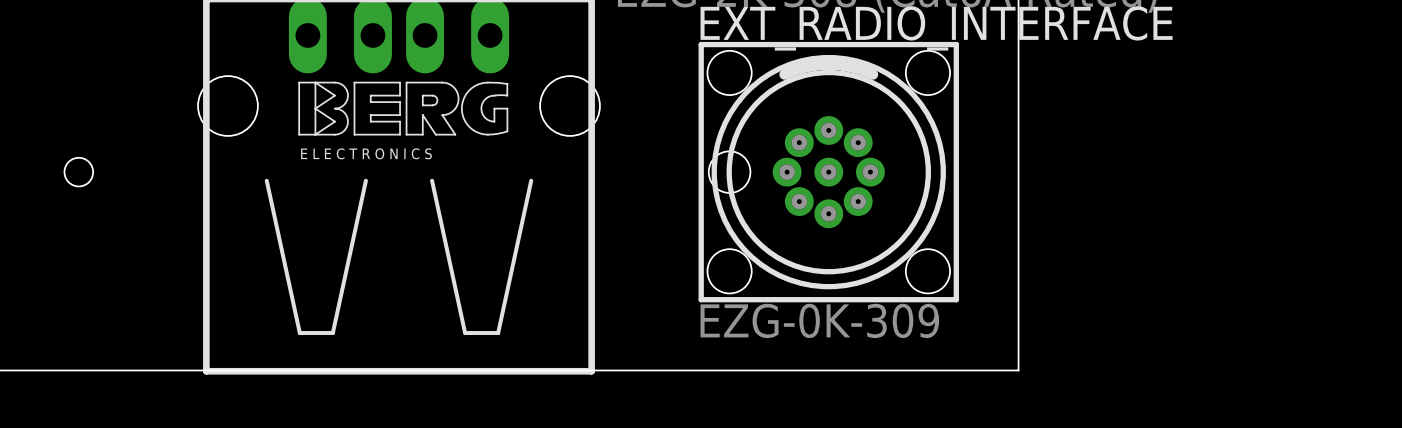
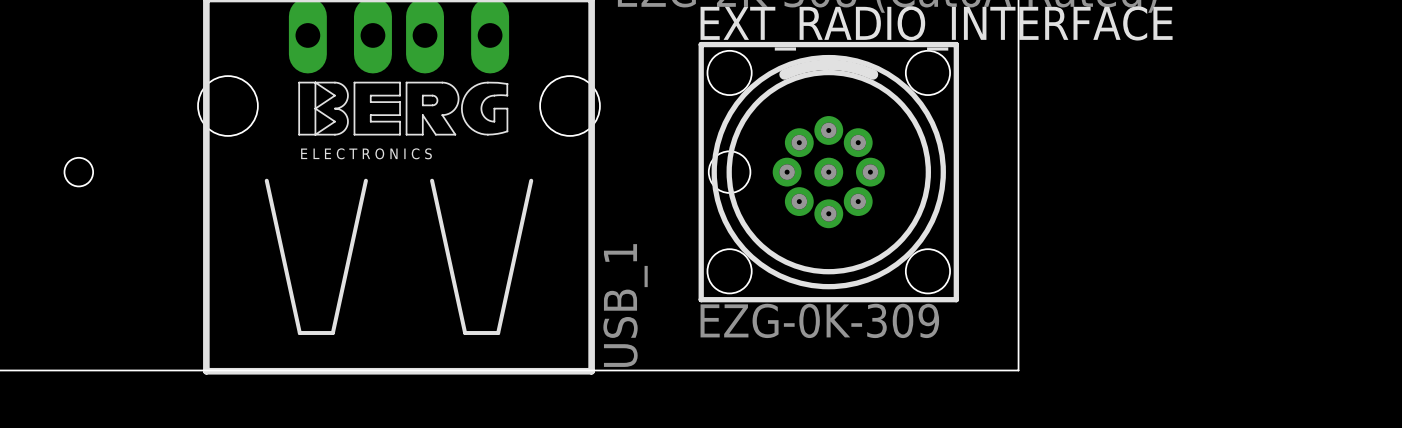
part value: none -> USB_1 (625, 305)

